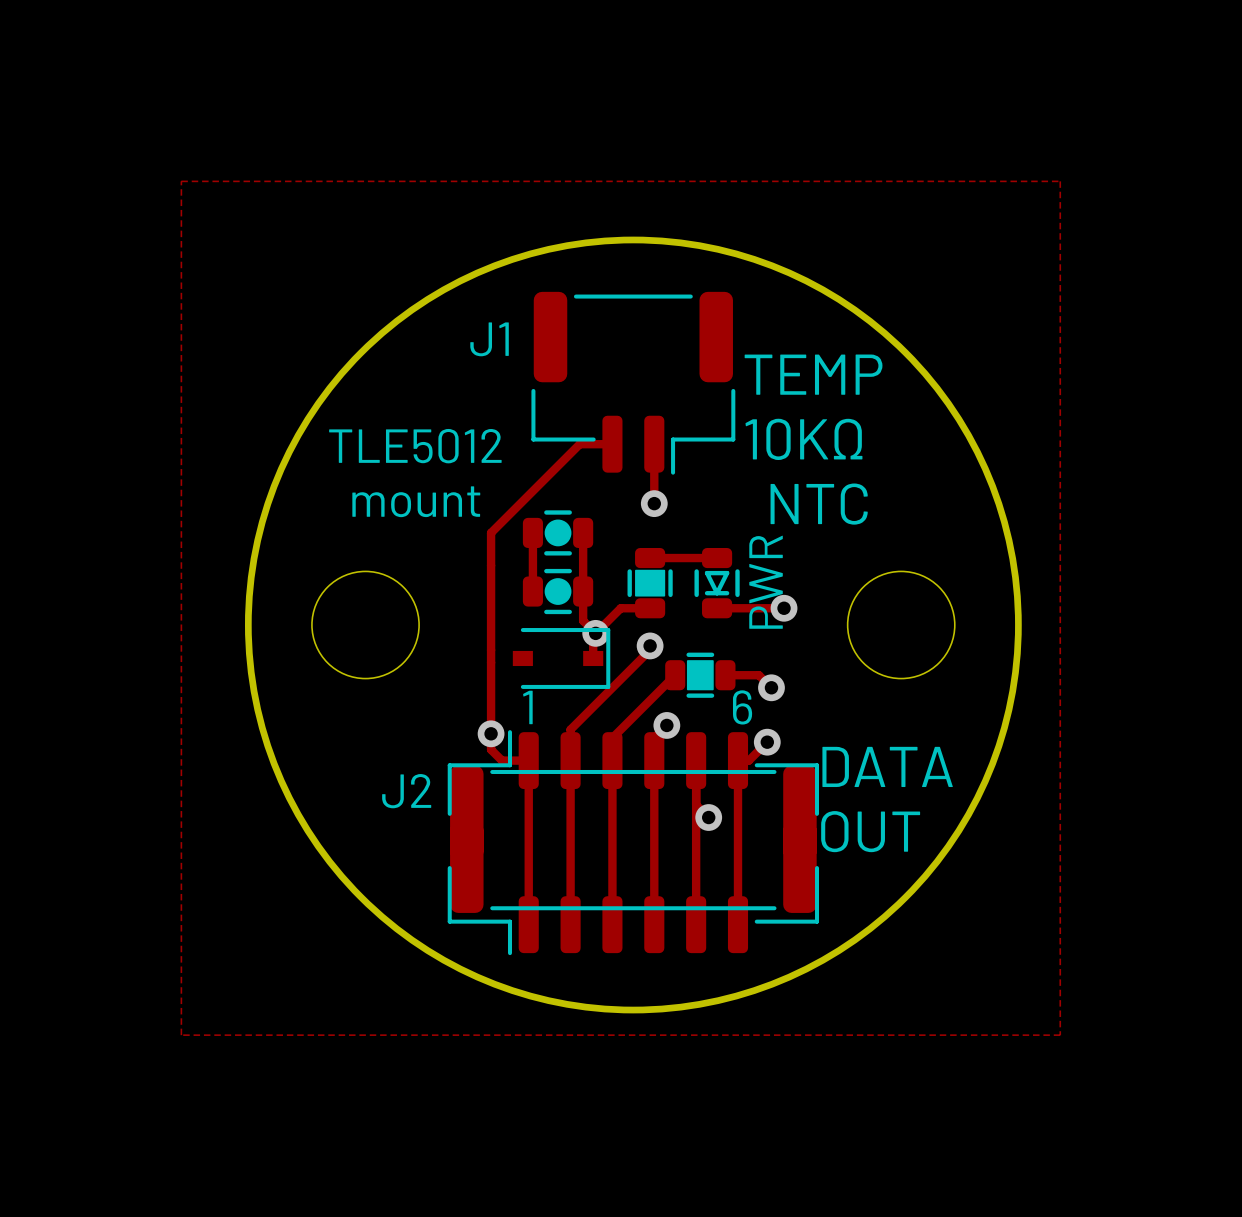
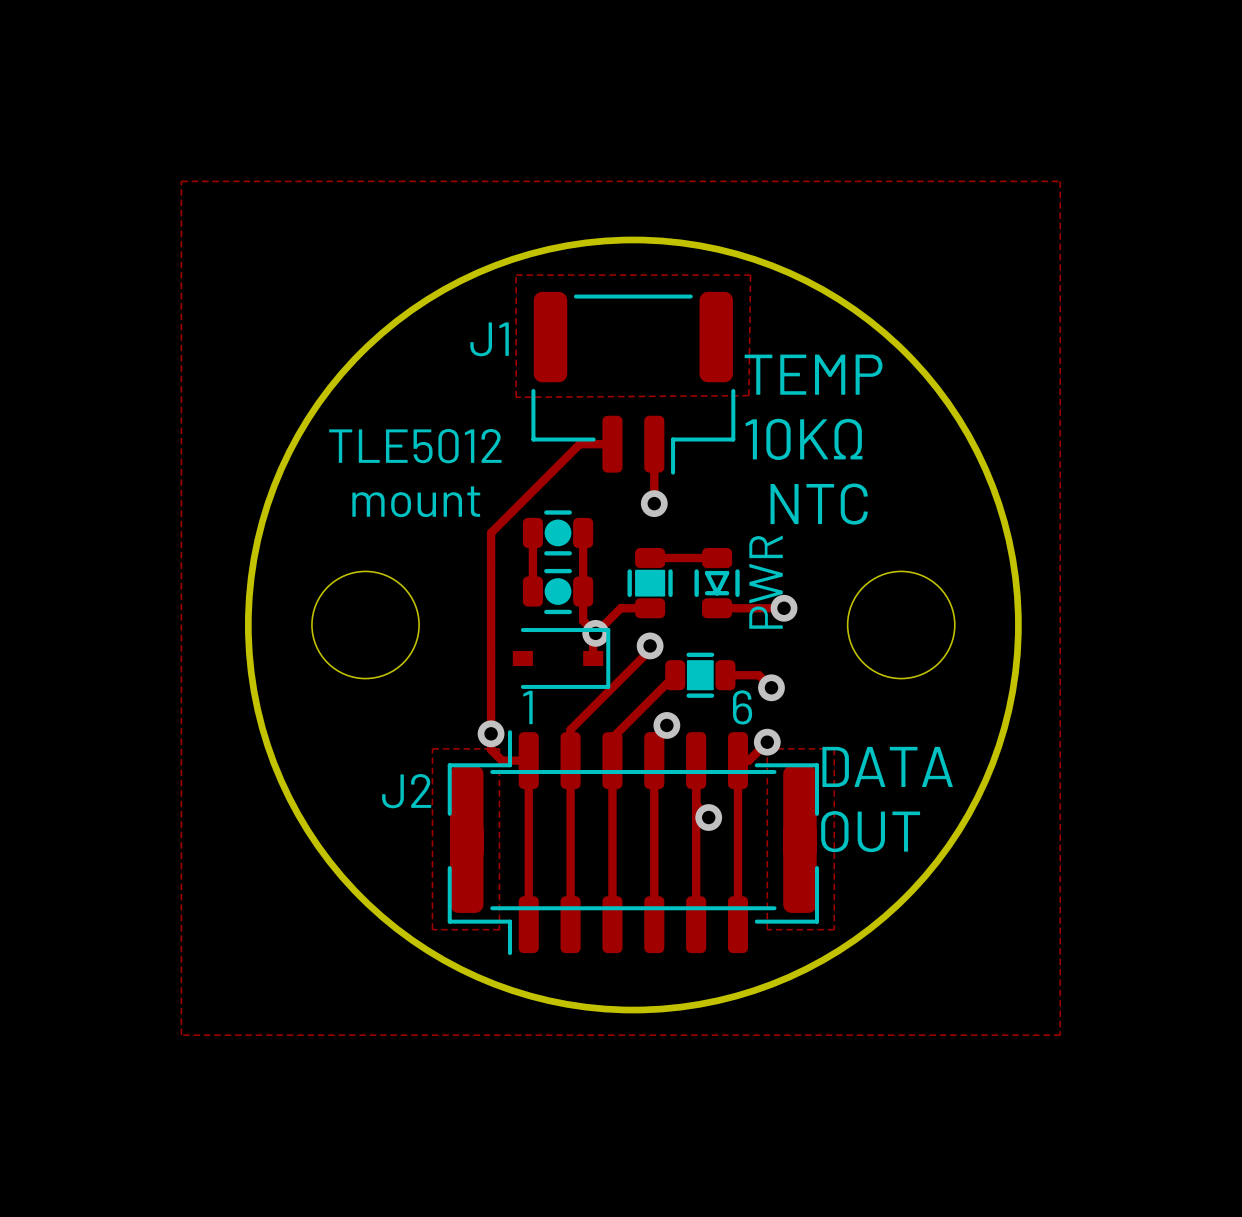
zone outline: none -> (516, 275) (516, 397) (748, 395) (750, 275) (516, 275)
zone outline: none -> (432, 748) (499, 748) (499, 929) (432, 929) (432, 748)
zone outline: none -> (767, 748) (767, 929) (834, 929) (834, 748) (767, 748)

